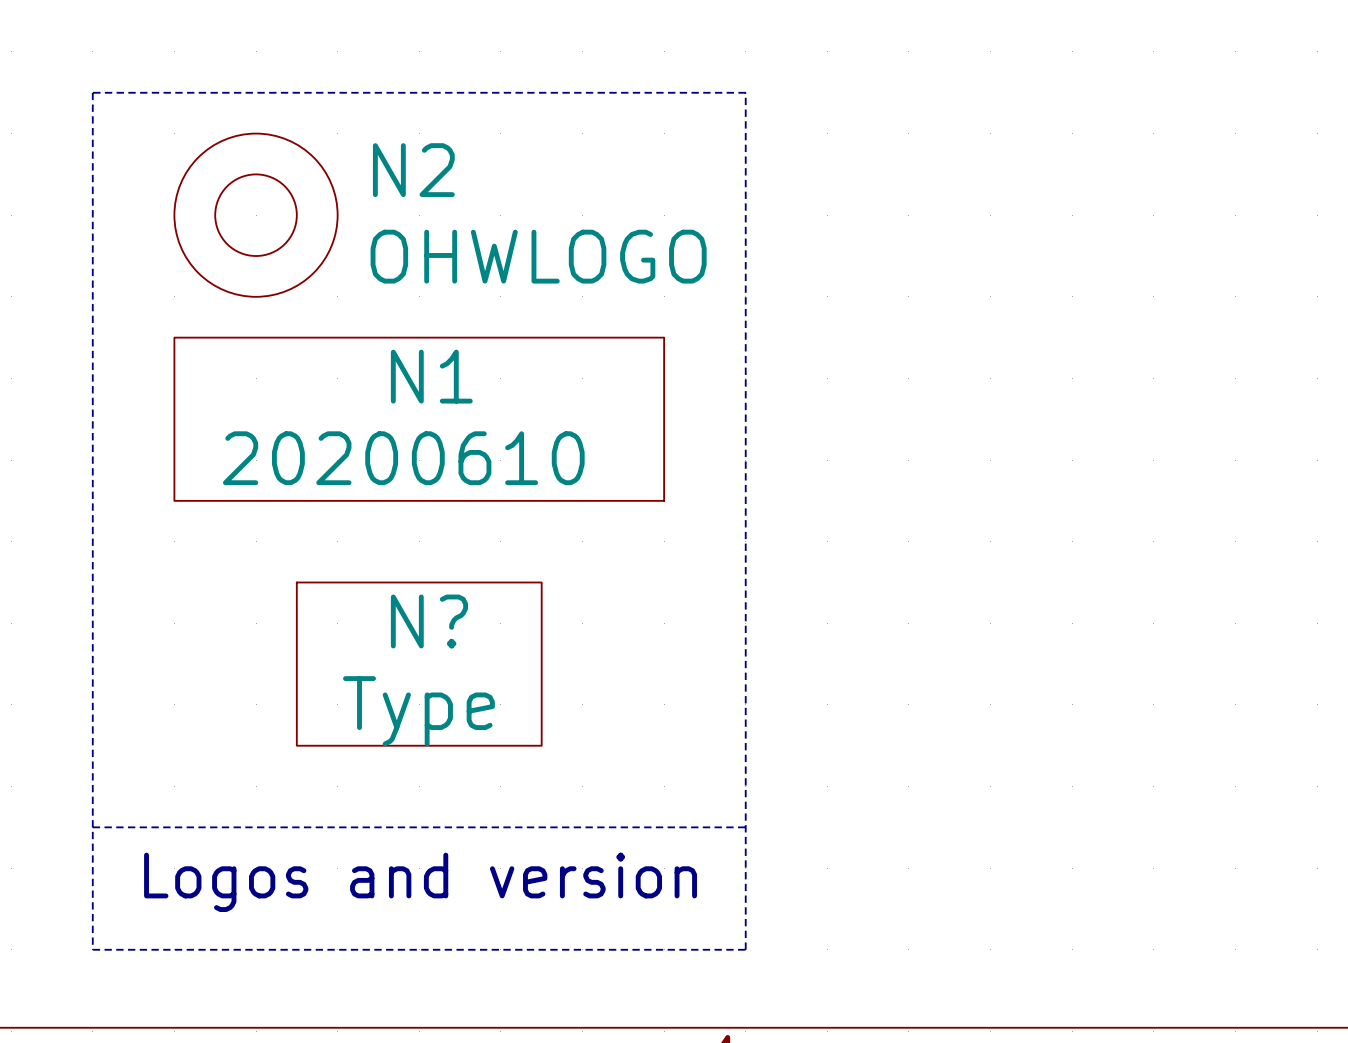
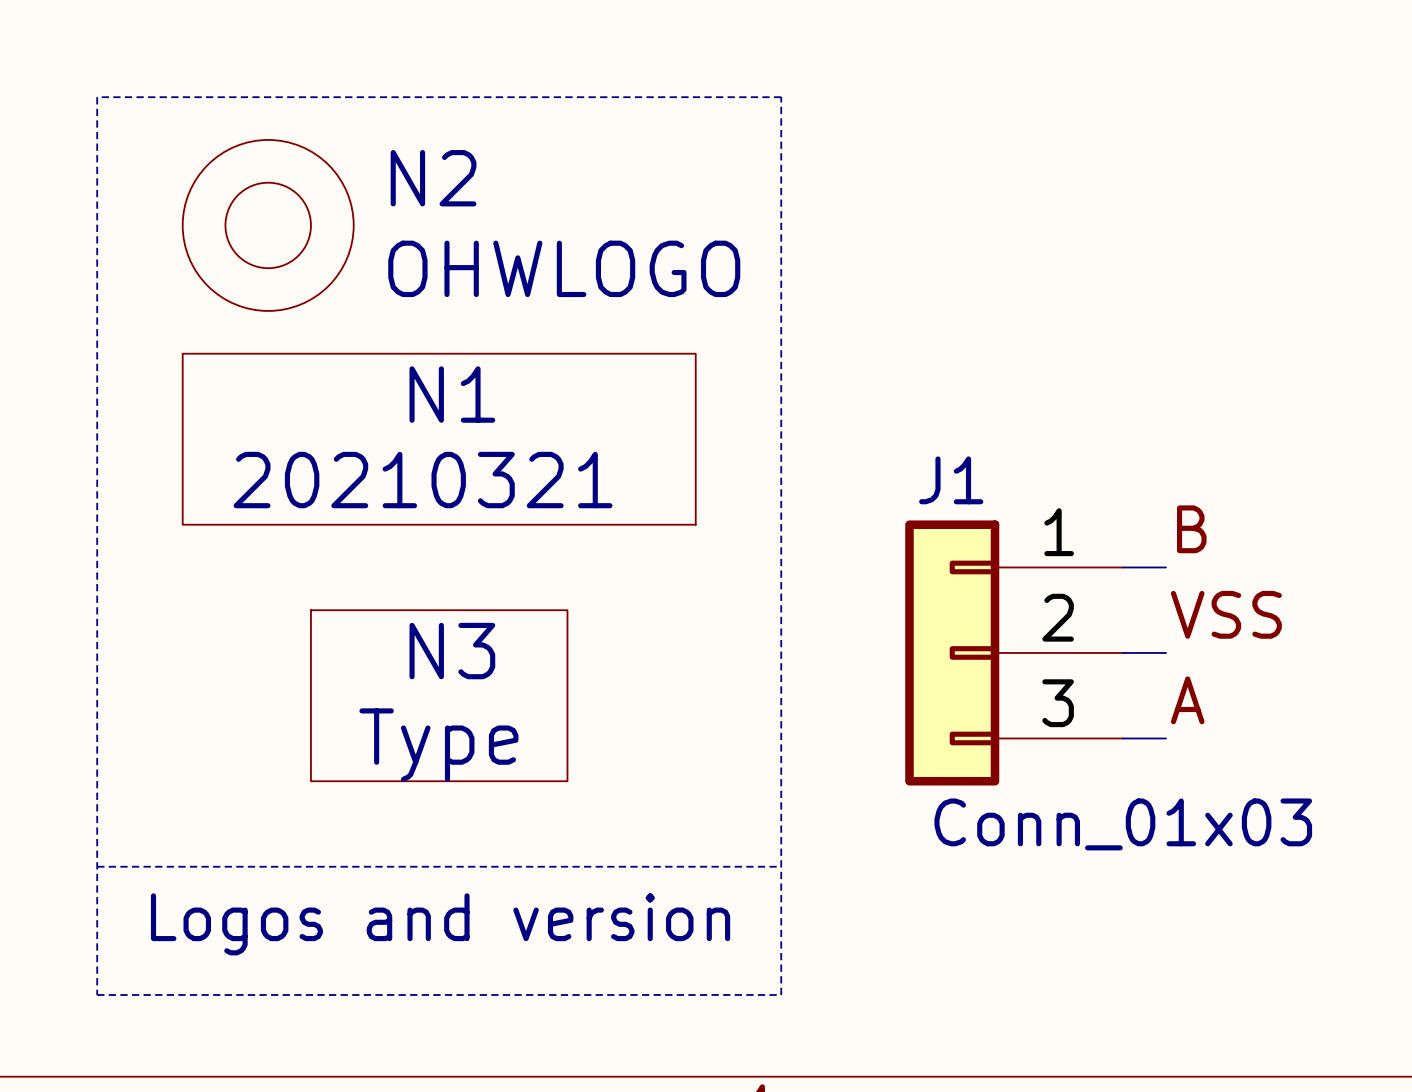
N1 value: 20200610 (403, 458) -> 20210321 (423, 480)
label: none -> B (1191, 529)
wire: none -> (1123, 567) (1166, 567)
label: none -> VSS (1226, 614)
N? name: N? (429, 621) -> N3 (452, 651)
J1: none -> Conn_01x03 (1014, 652)
wire: none -> (1123, 652) (1166, 652)
label: none -> A (1187, 700)
wire: none -> (1123, 738) (1166, 738)

